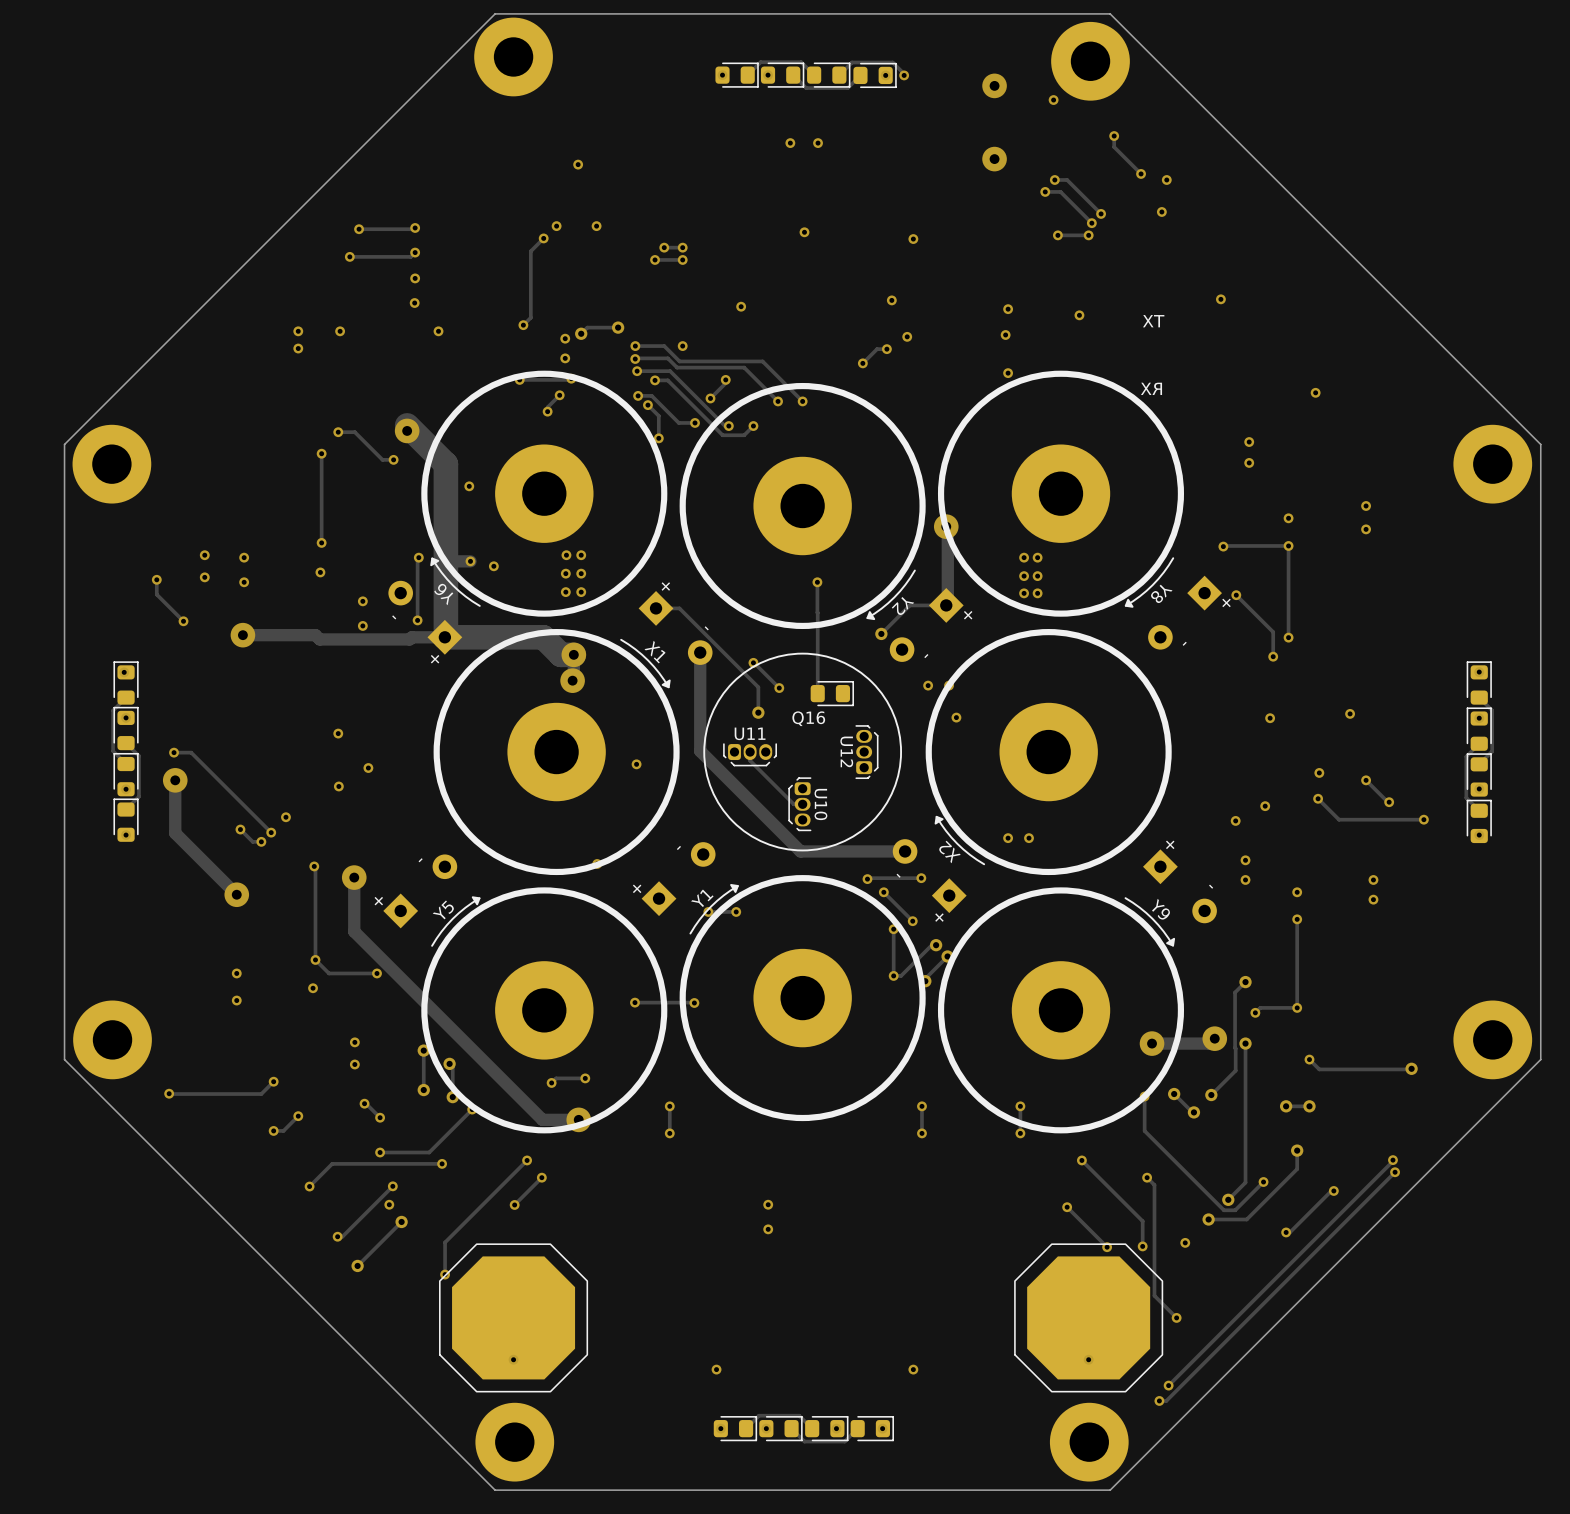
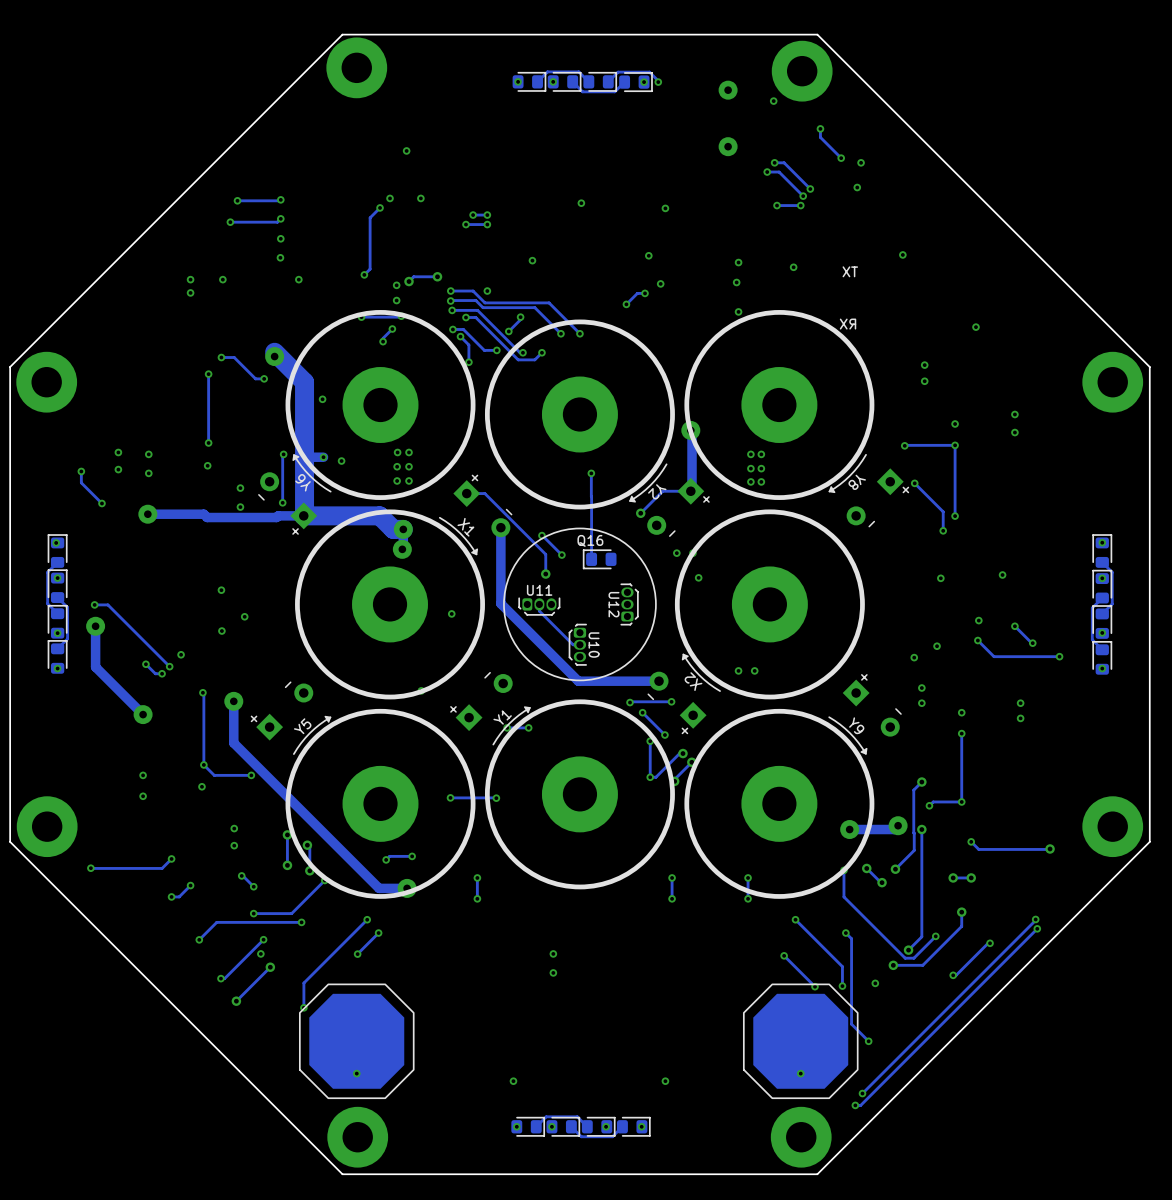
via: (790, 143) -> none
via: (818, 143) -> none
Q16 rotation: 0° (832, 693) -> 180° (599, 559)
Q16 name position: Q16 (808, 718) -> Q16 (590, 540)

